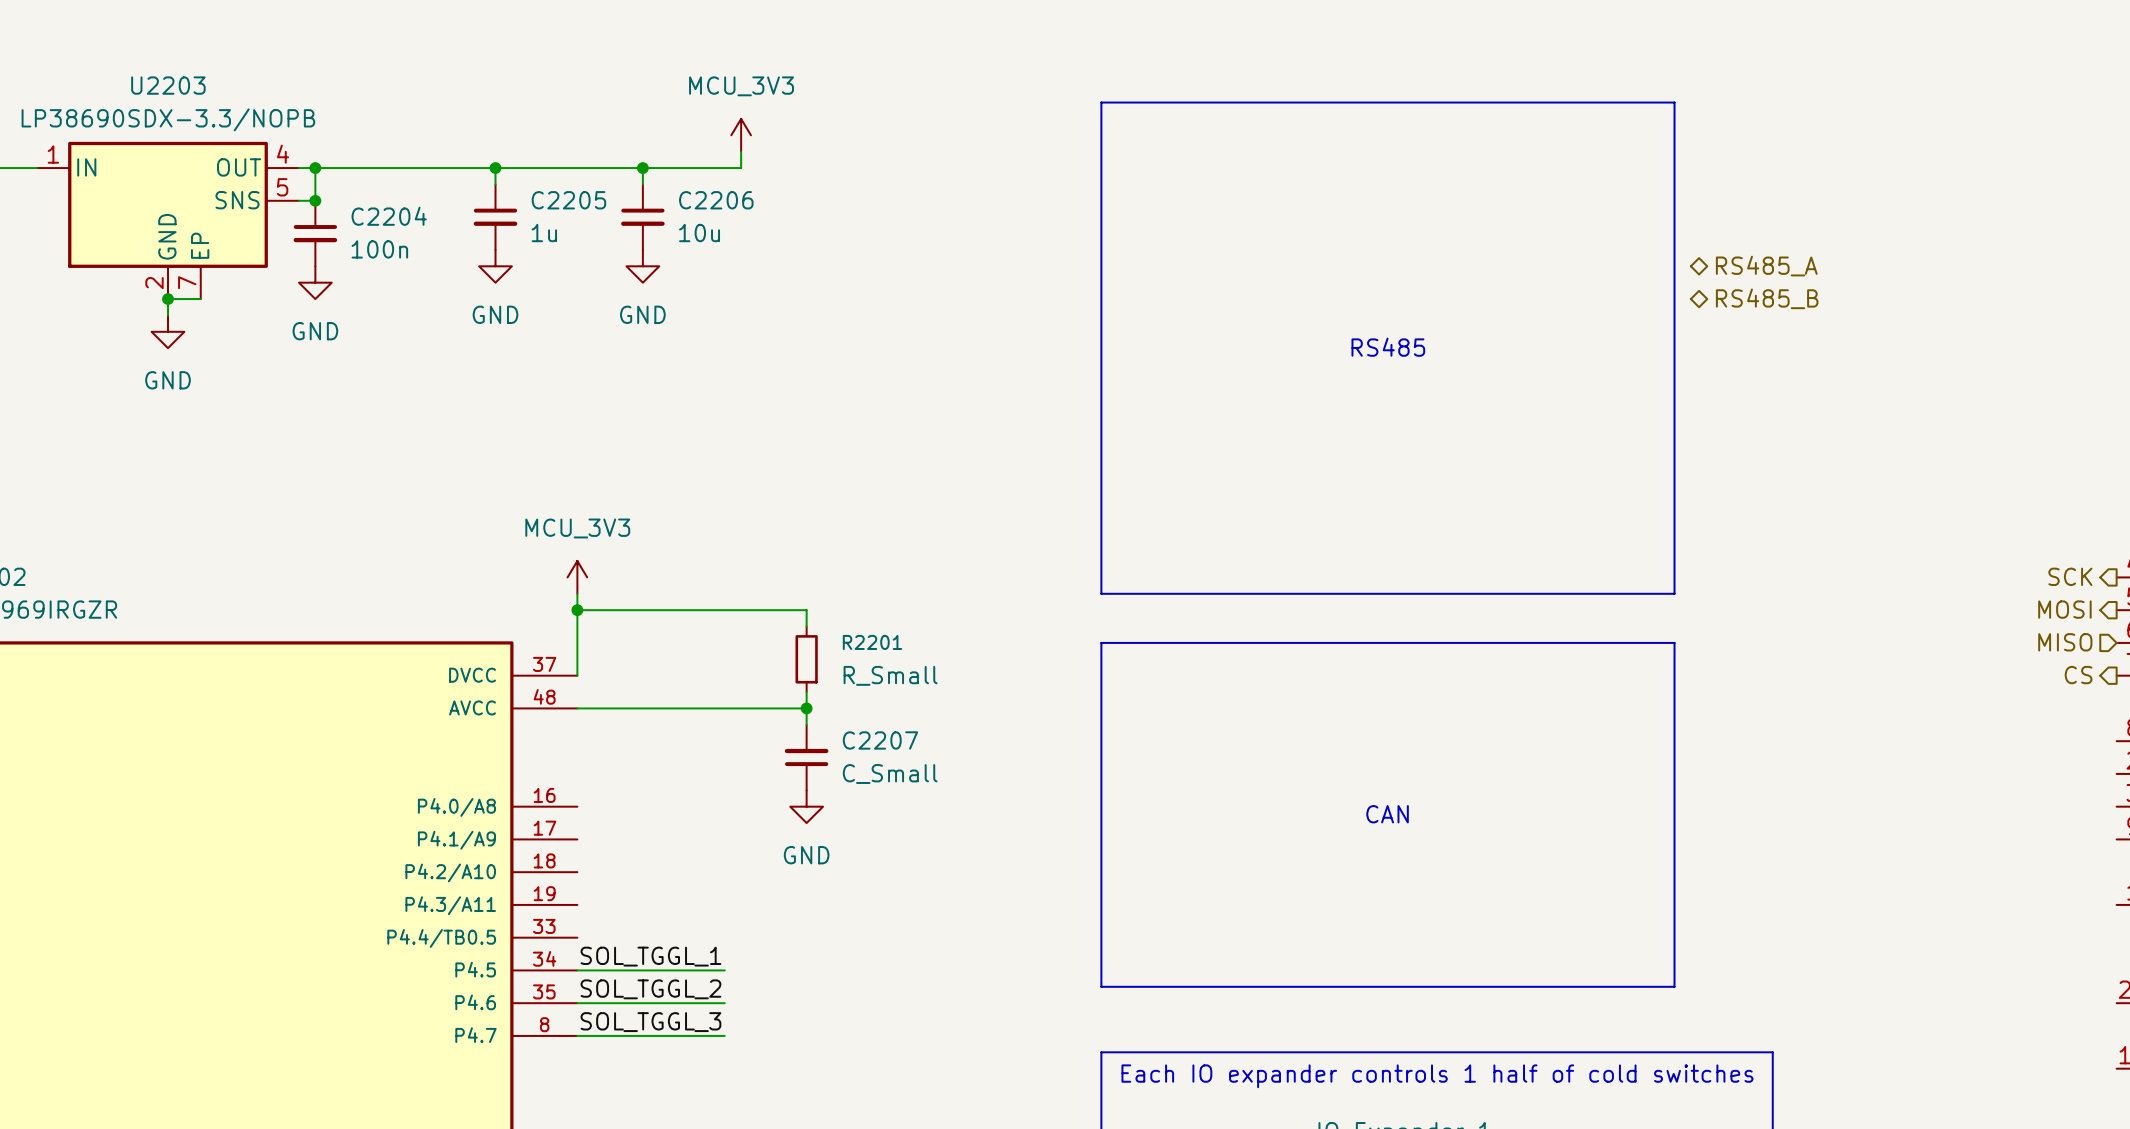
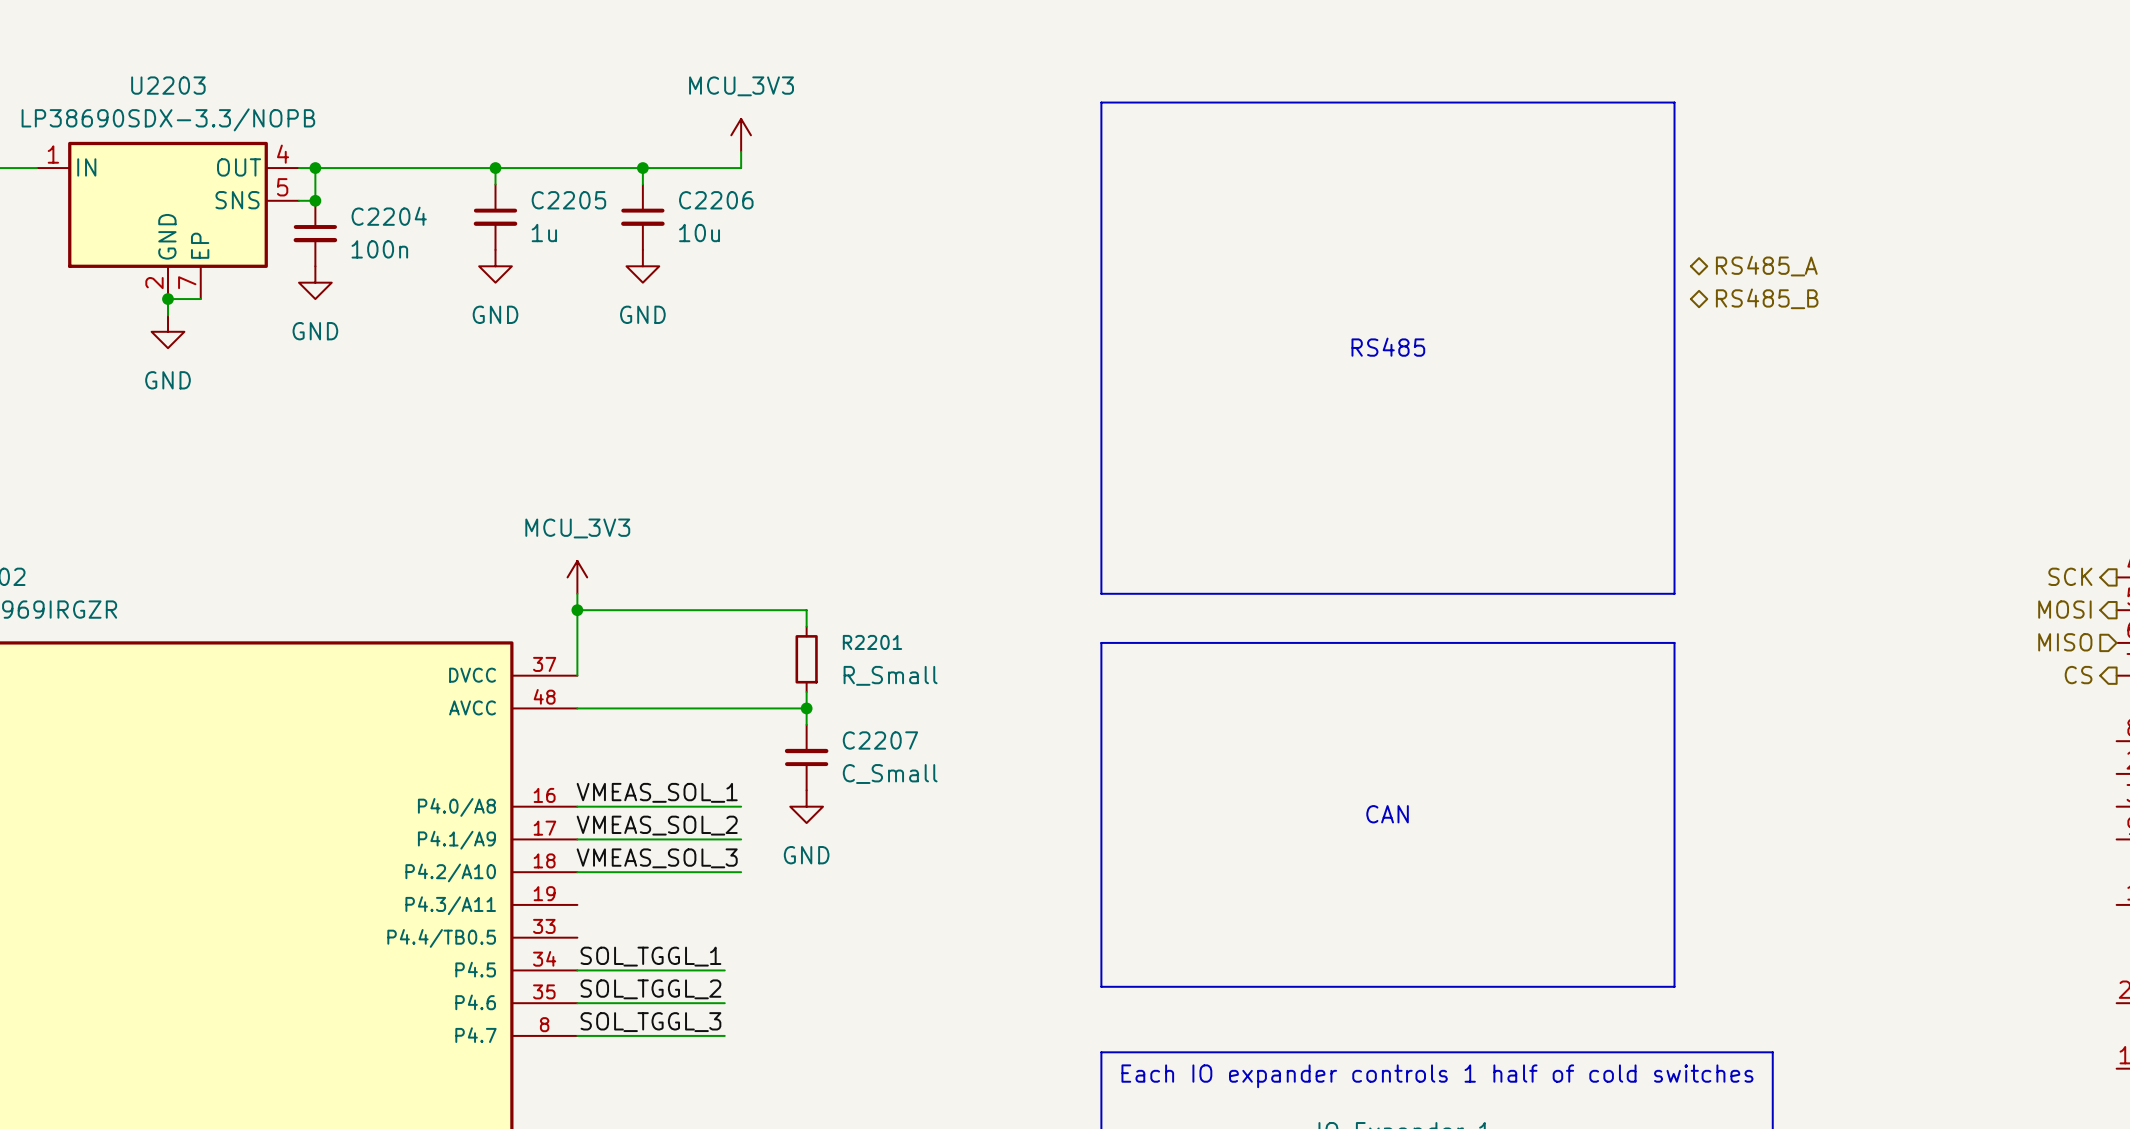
label: none -> VMEAS_SOL_1 (657, 792)
wire: none -> (577, 806) (741, 806)
label: none -> VMEAS_SOL_2 (657, 825)
wire: none -> (577, 839) (741, 839)
label: none -> VMEAS_SOL_3 (657, 858)
wire: none -> (577, 872) (741, 872)

